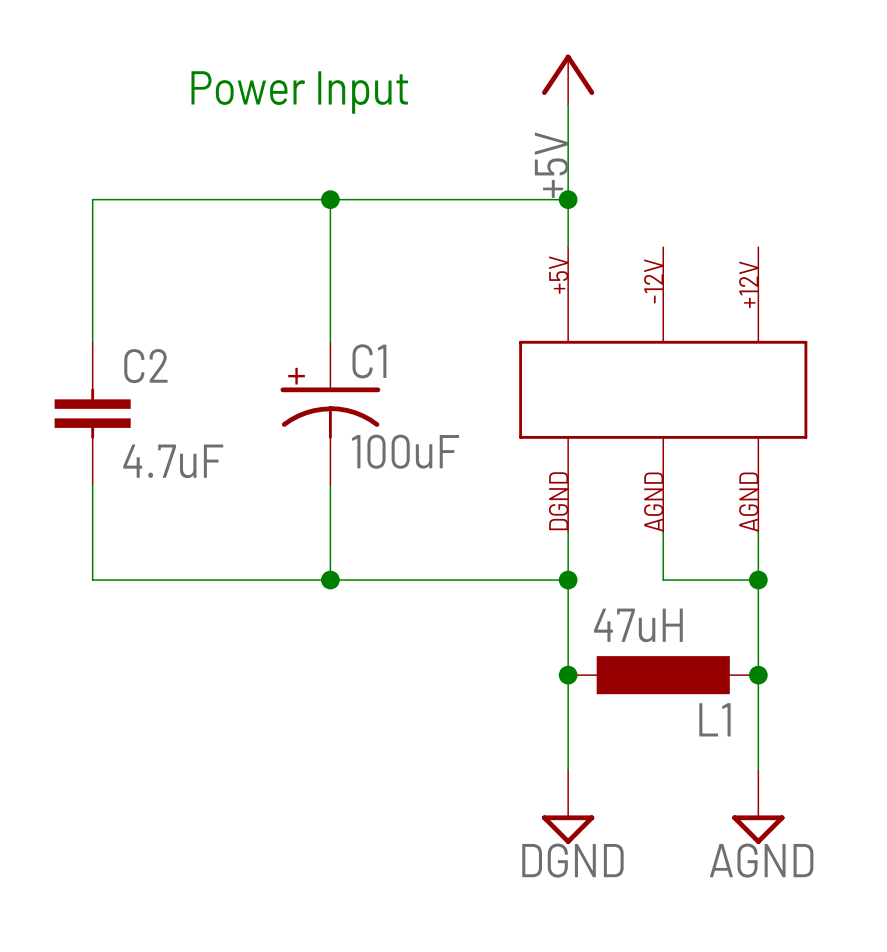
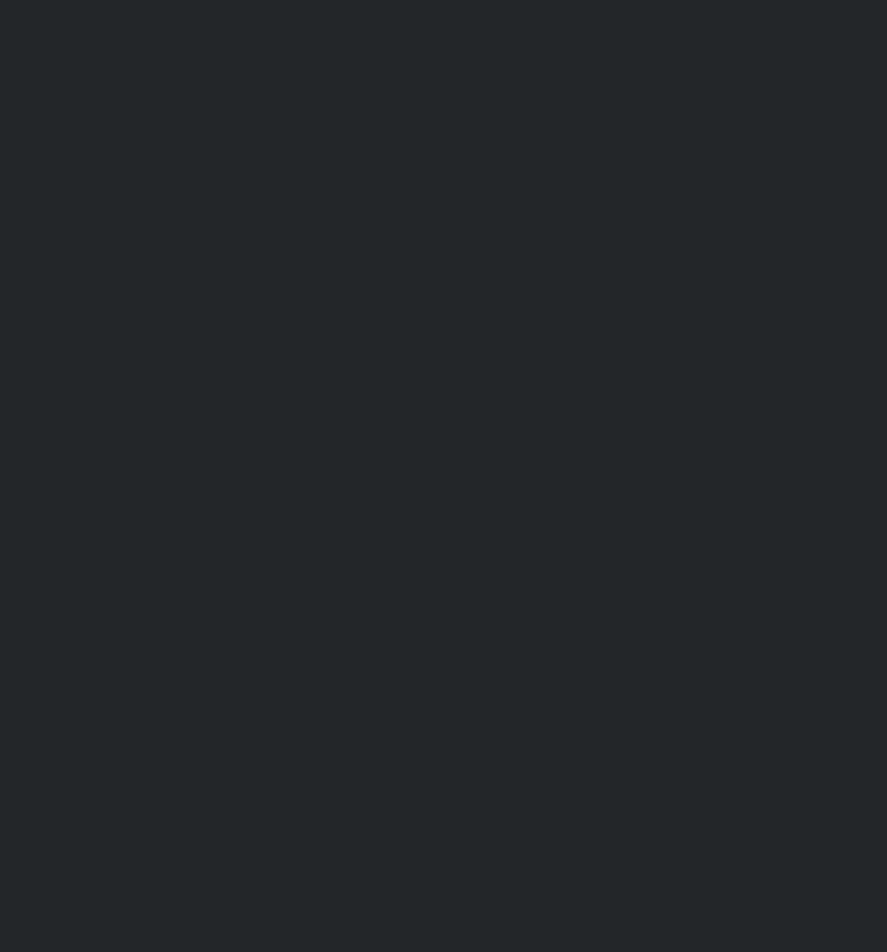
power symbol: +5V (568, 79) -> none
text: Power Input (299, 92) -> none
wire: (568, 104) (568, 247) -> none
wire: (330, 199) (330, 342) -> none
junction: (330, 199) -> none
wire: (568, 199) (92, 199) (92, 342) -> none
junction: (568, 199) -> none
part: (663, 389) -> none
C2: 4.7uF (92, 413) -> none
C1: 100uF (330, 413) -> none
wire: (92, 484) (92, 580) (568, 580) -> none
wire: (330, 484) (330, 580) -> none
wire: (568, 532) (568, 770) -> none
wire: (663, 532) (663, 580) (758, 580) -> none
wire: (758, 532) (758, 770) -> none
junction: (330, 580) -> none
junction: (568, 580) -> none
junction: (758, 580) -> none
junction: (568, 675) -> none
L1: 47uH (663, 675) -> none
junction: (758, 675) -> none
power symbol: DGND (568, 807) -> none
power symbol: AGND (758, 807) -> none

